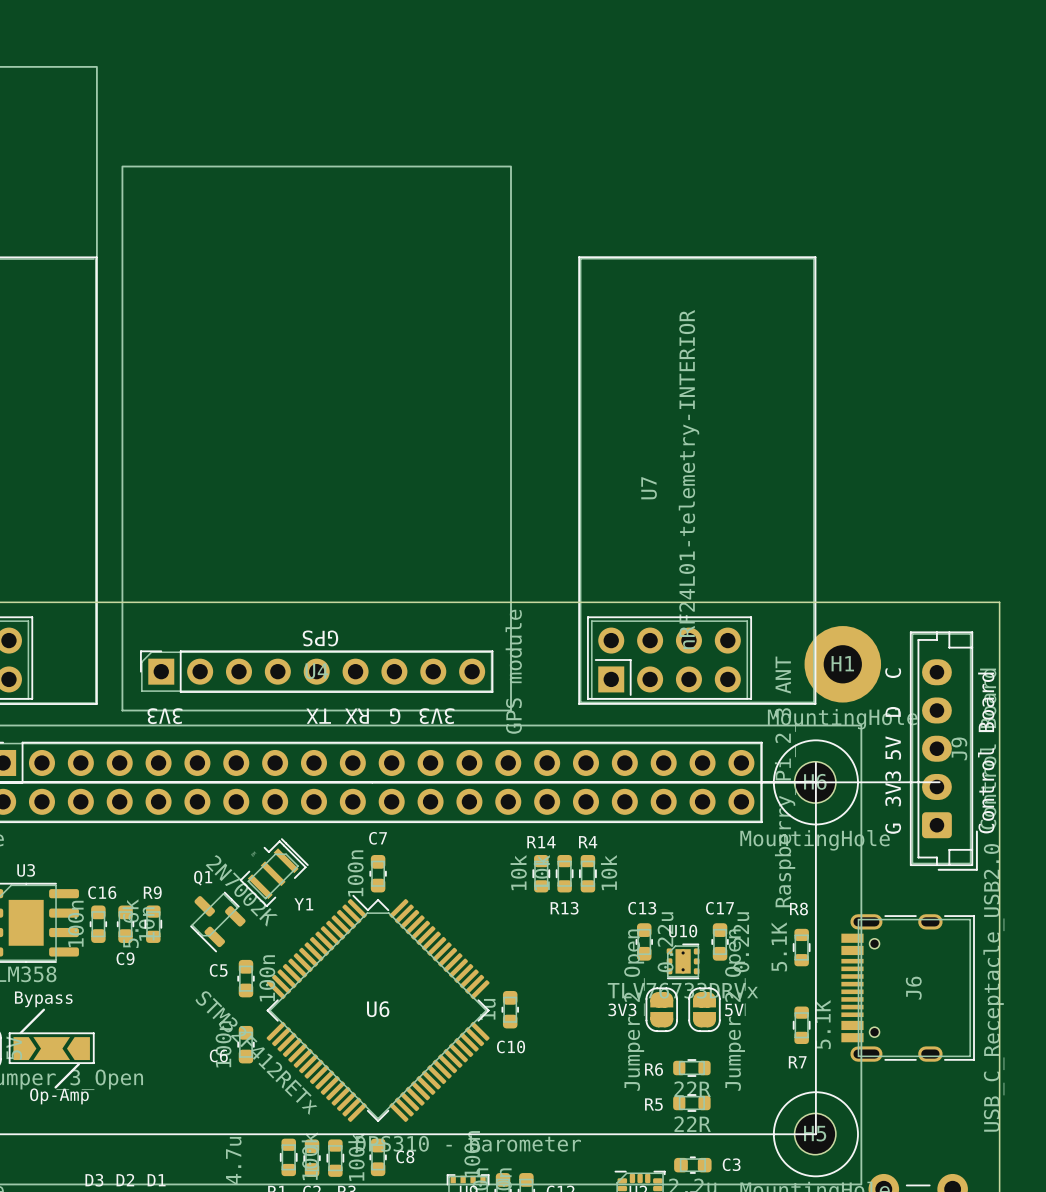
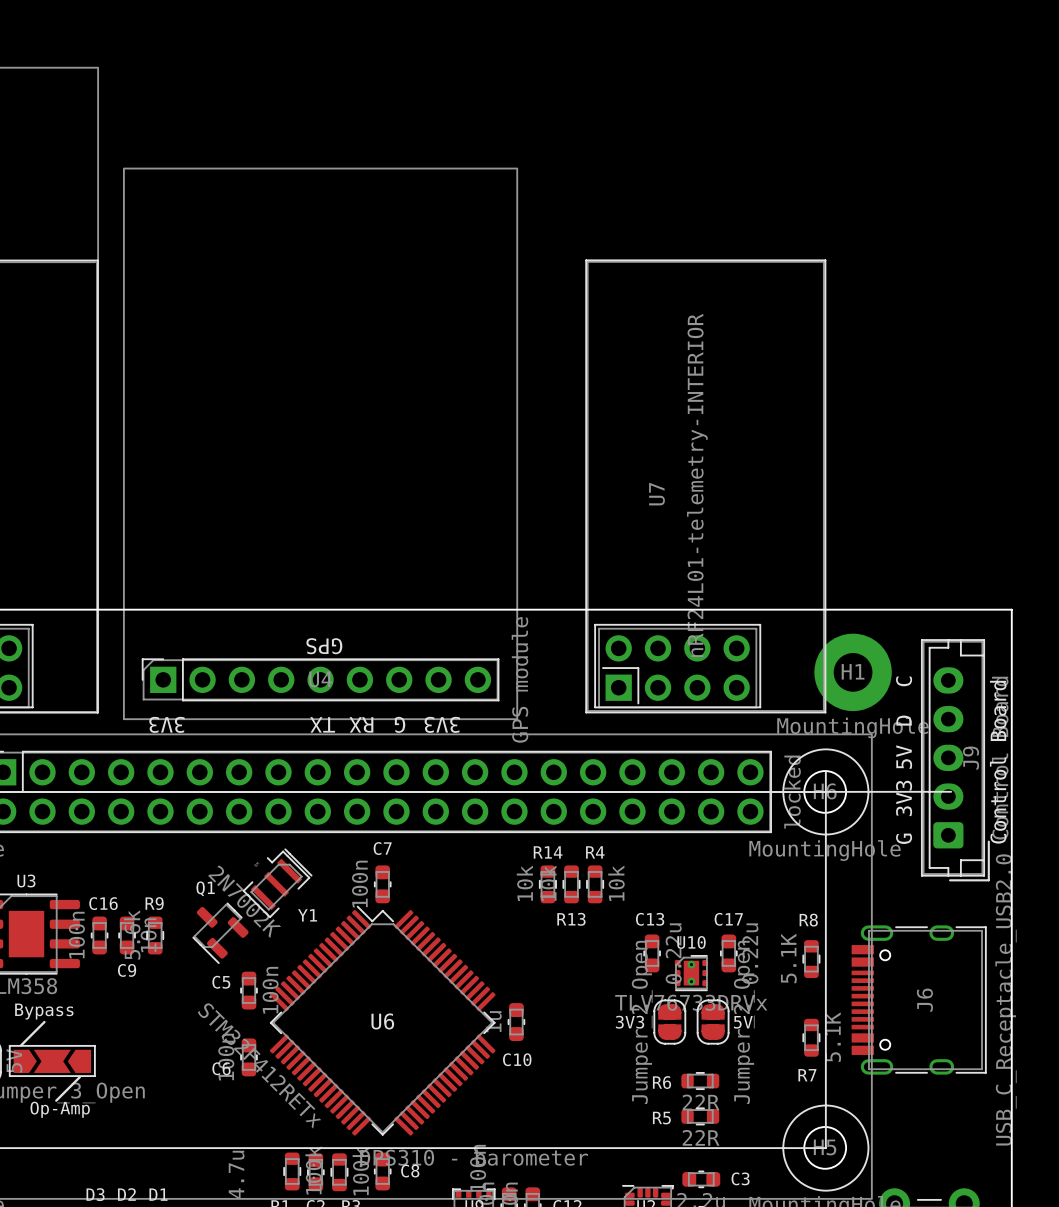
part value: Raspberry_Pi_2_3 ANT (785, 781) -> locked (792, 792)

